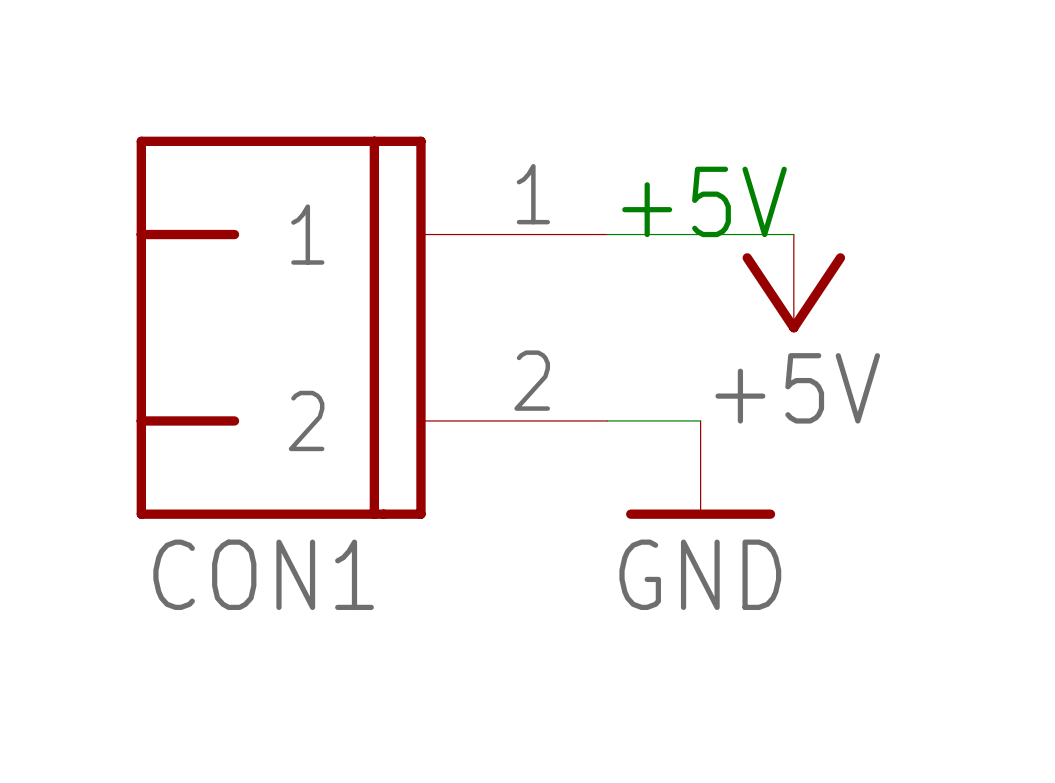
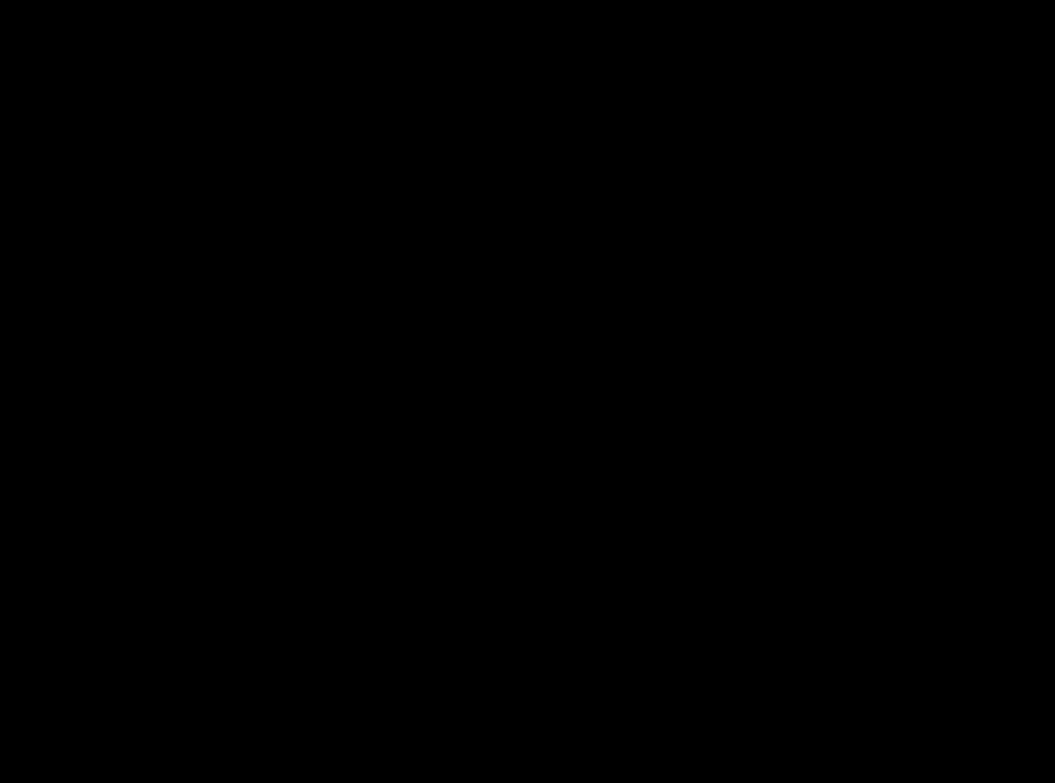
text: +5V (704, 201) -> none
wire: (607, 234) (793, 234) -> none
power symbol: +5V (793, 283) -> none
CON1: (372, 327) -> none
wire: (607, 420) (700, 420) -> none
power symbol: GND (700, 469) -> none

